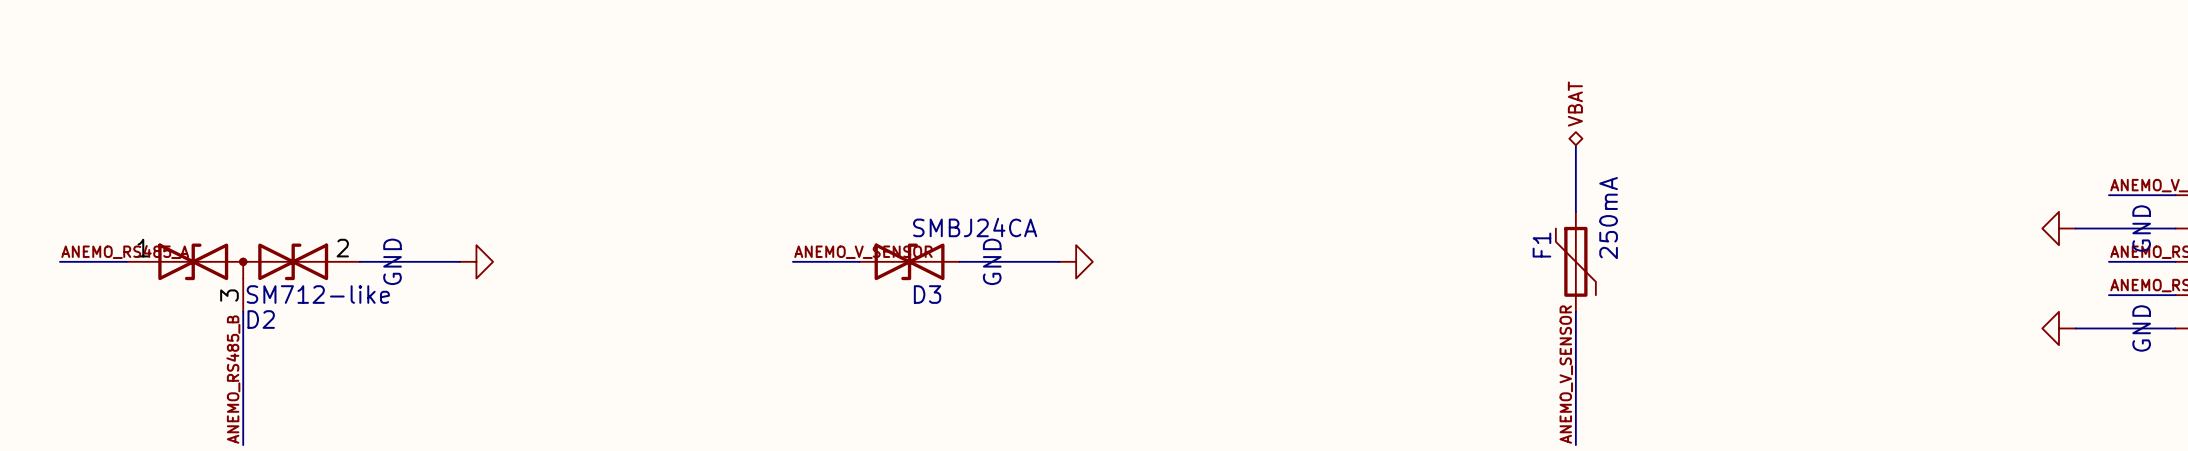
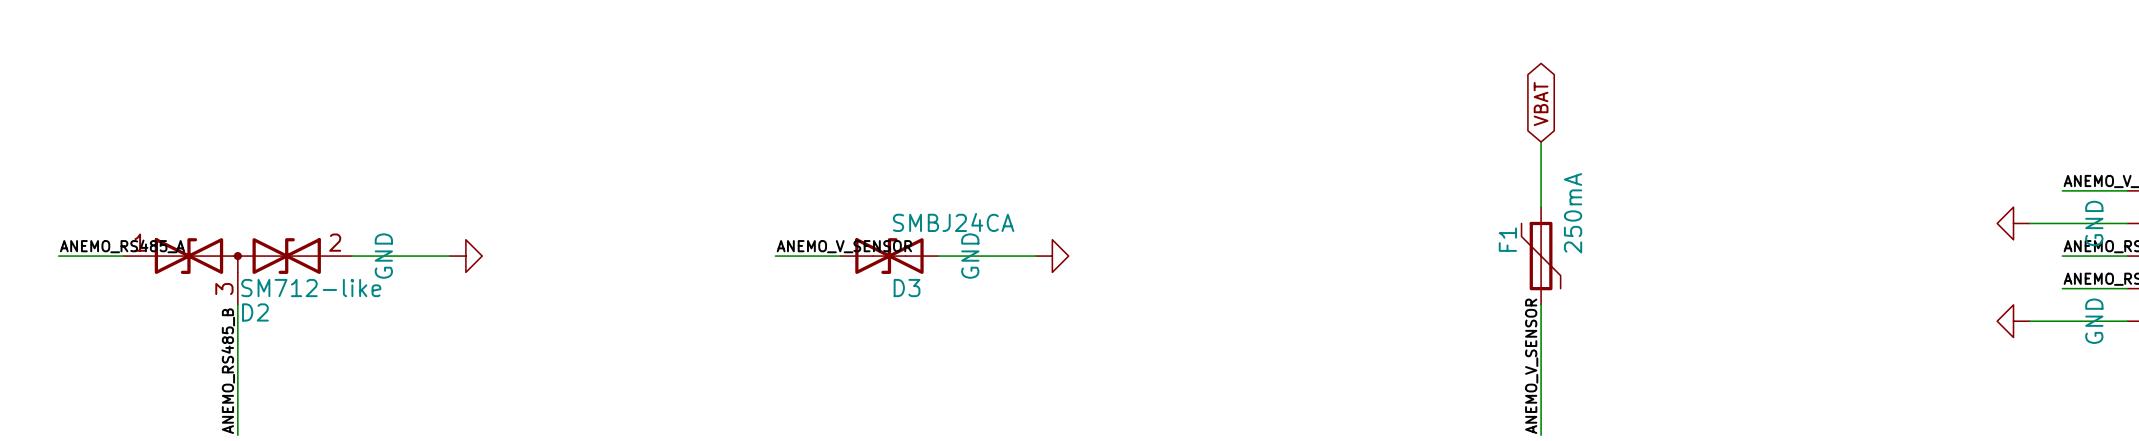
hierarchical label: VBAT (1575, 104) -> none
global label: none -> VBAT (1541, 104)

